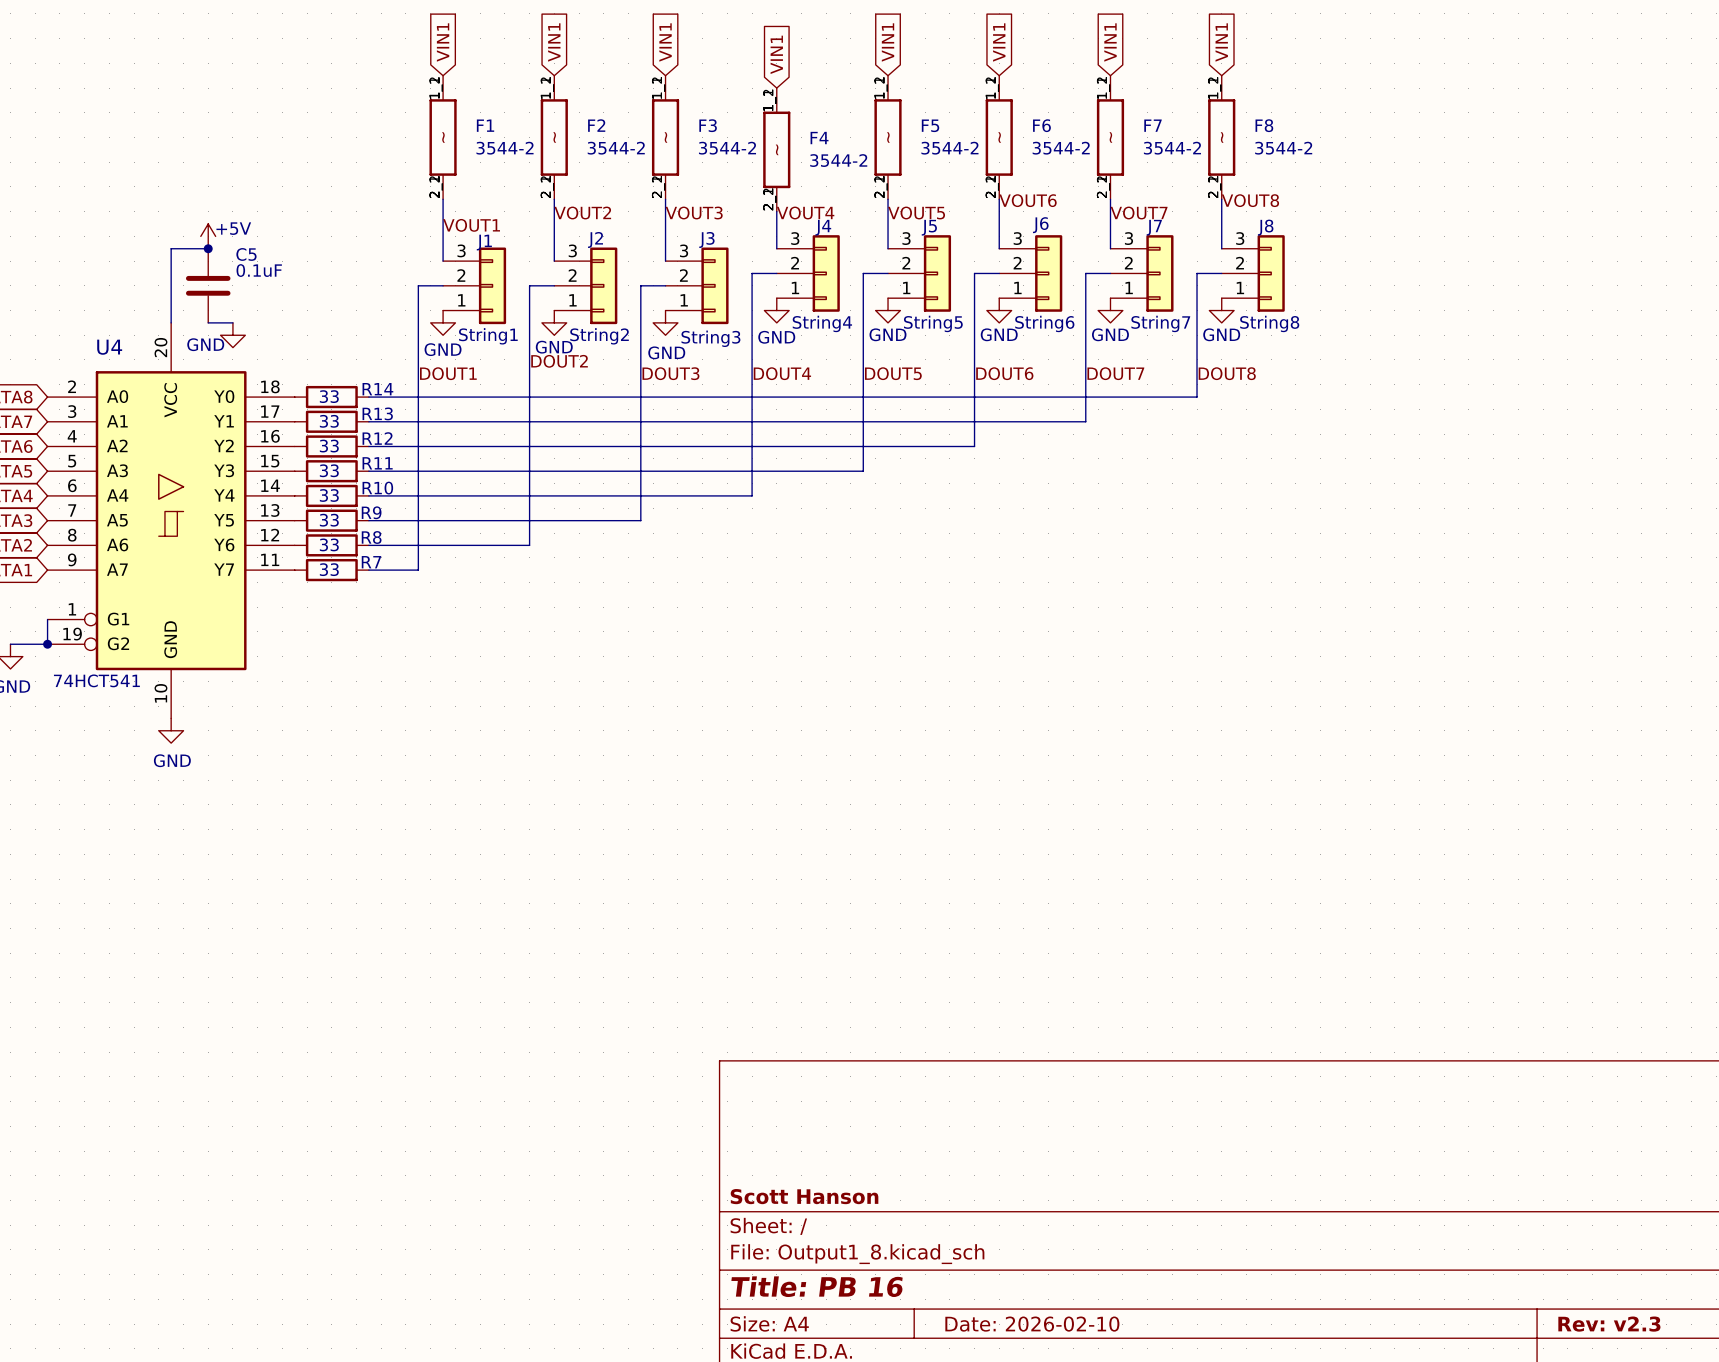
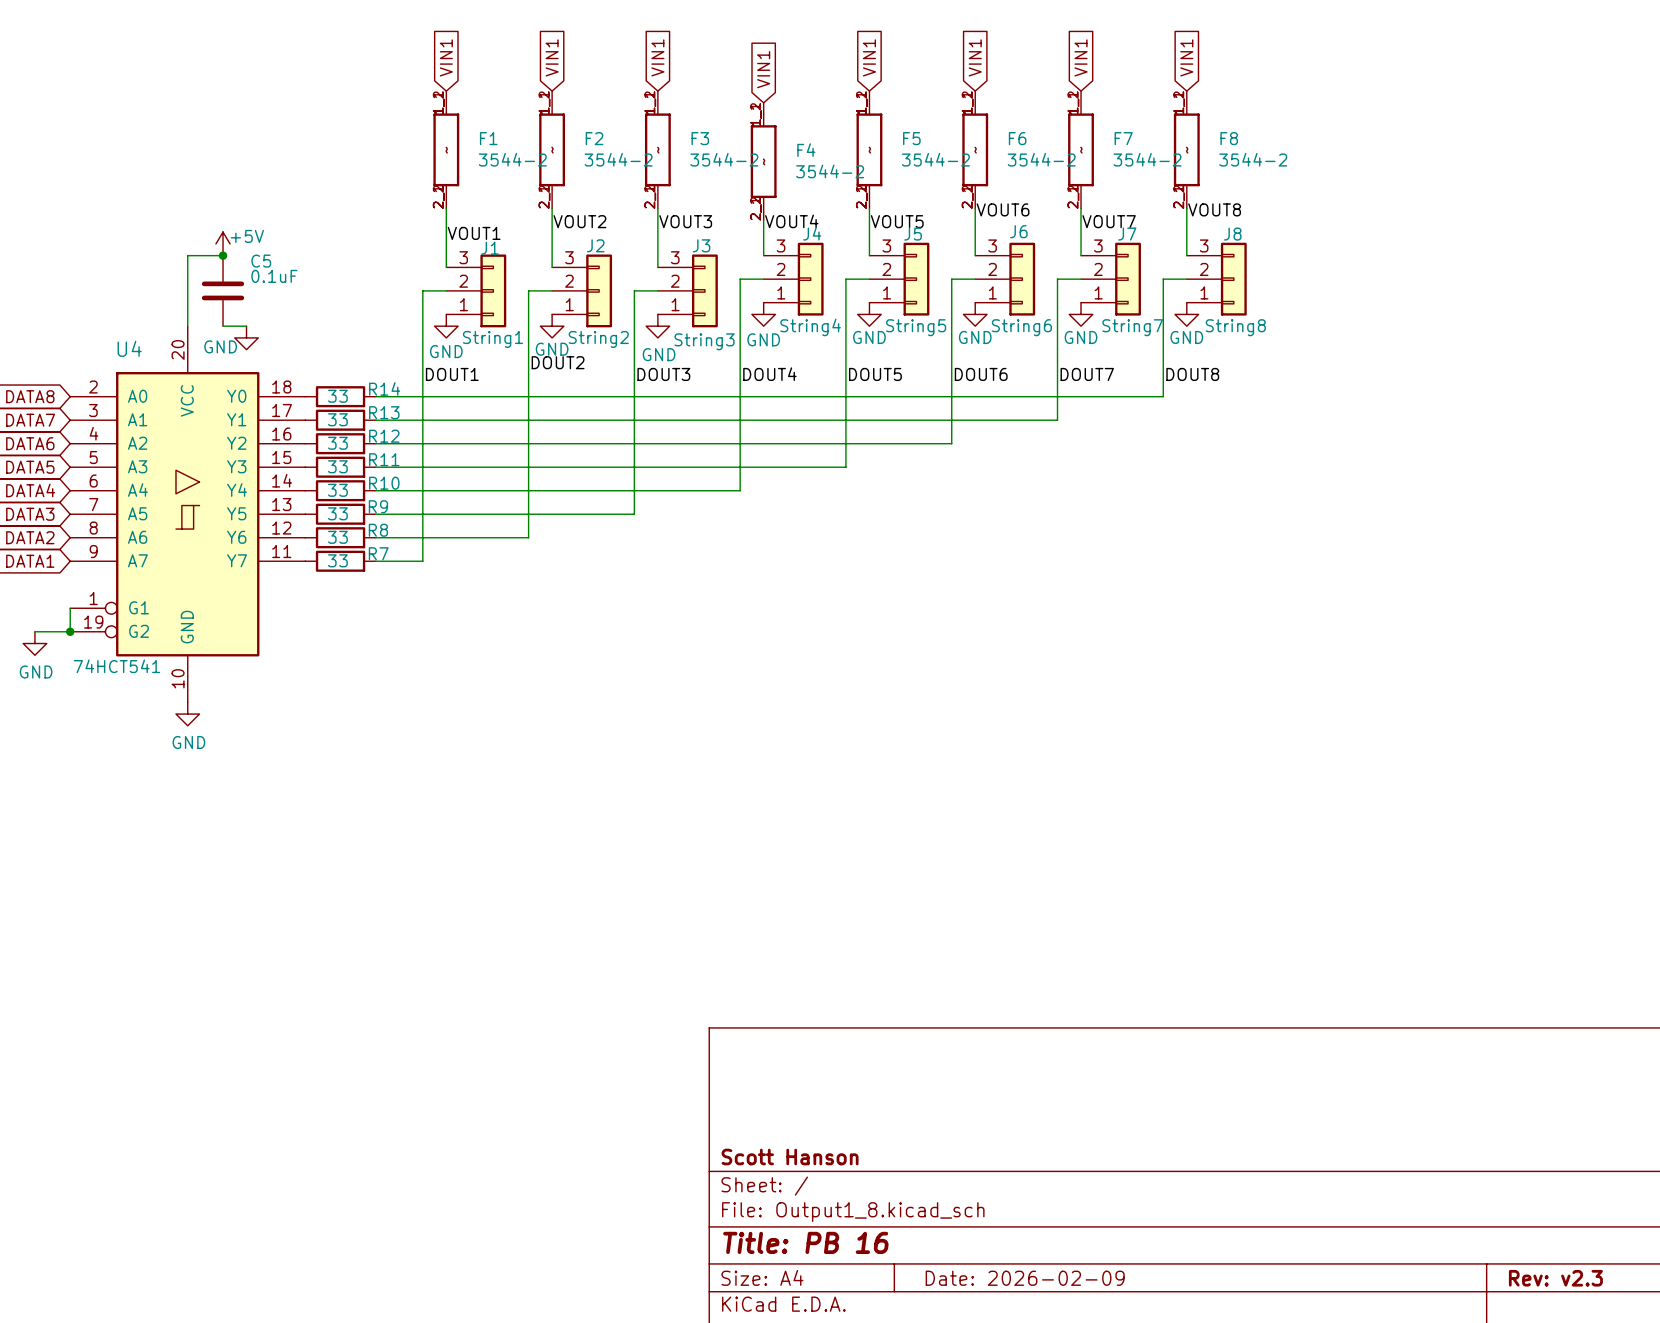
title block: Date: 2026-02-10 (1032, 1324) -> Date: 2026-02-09 (1025, 1278)

